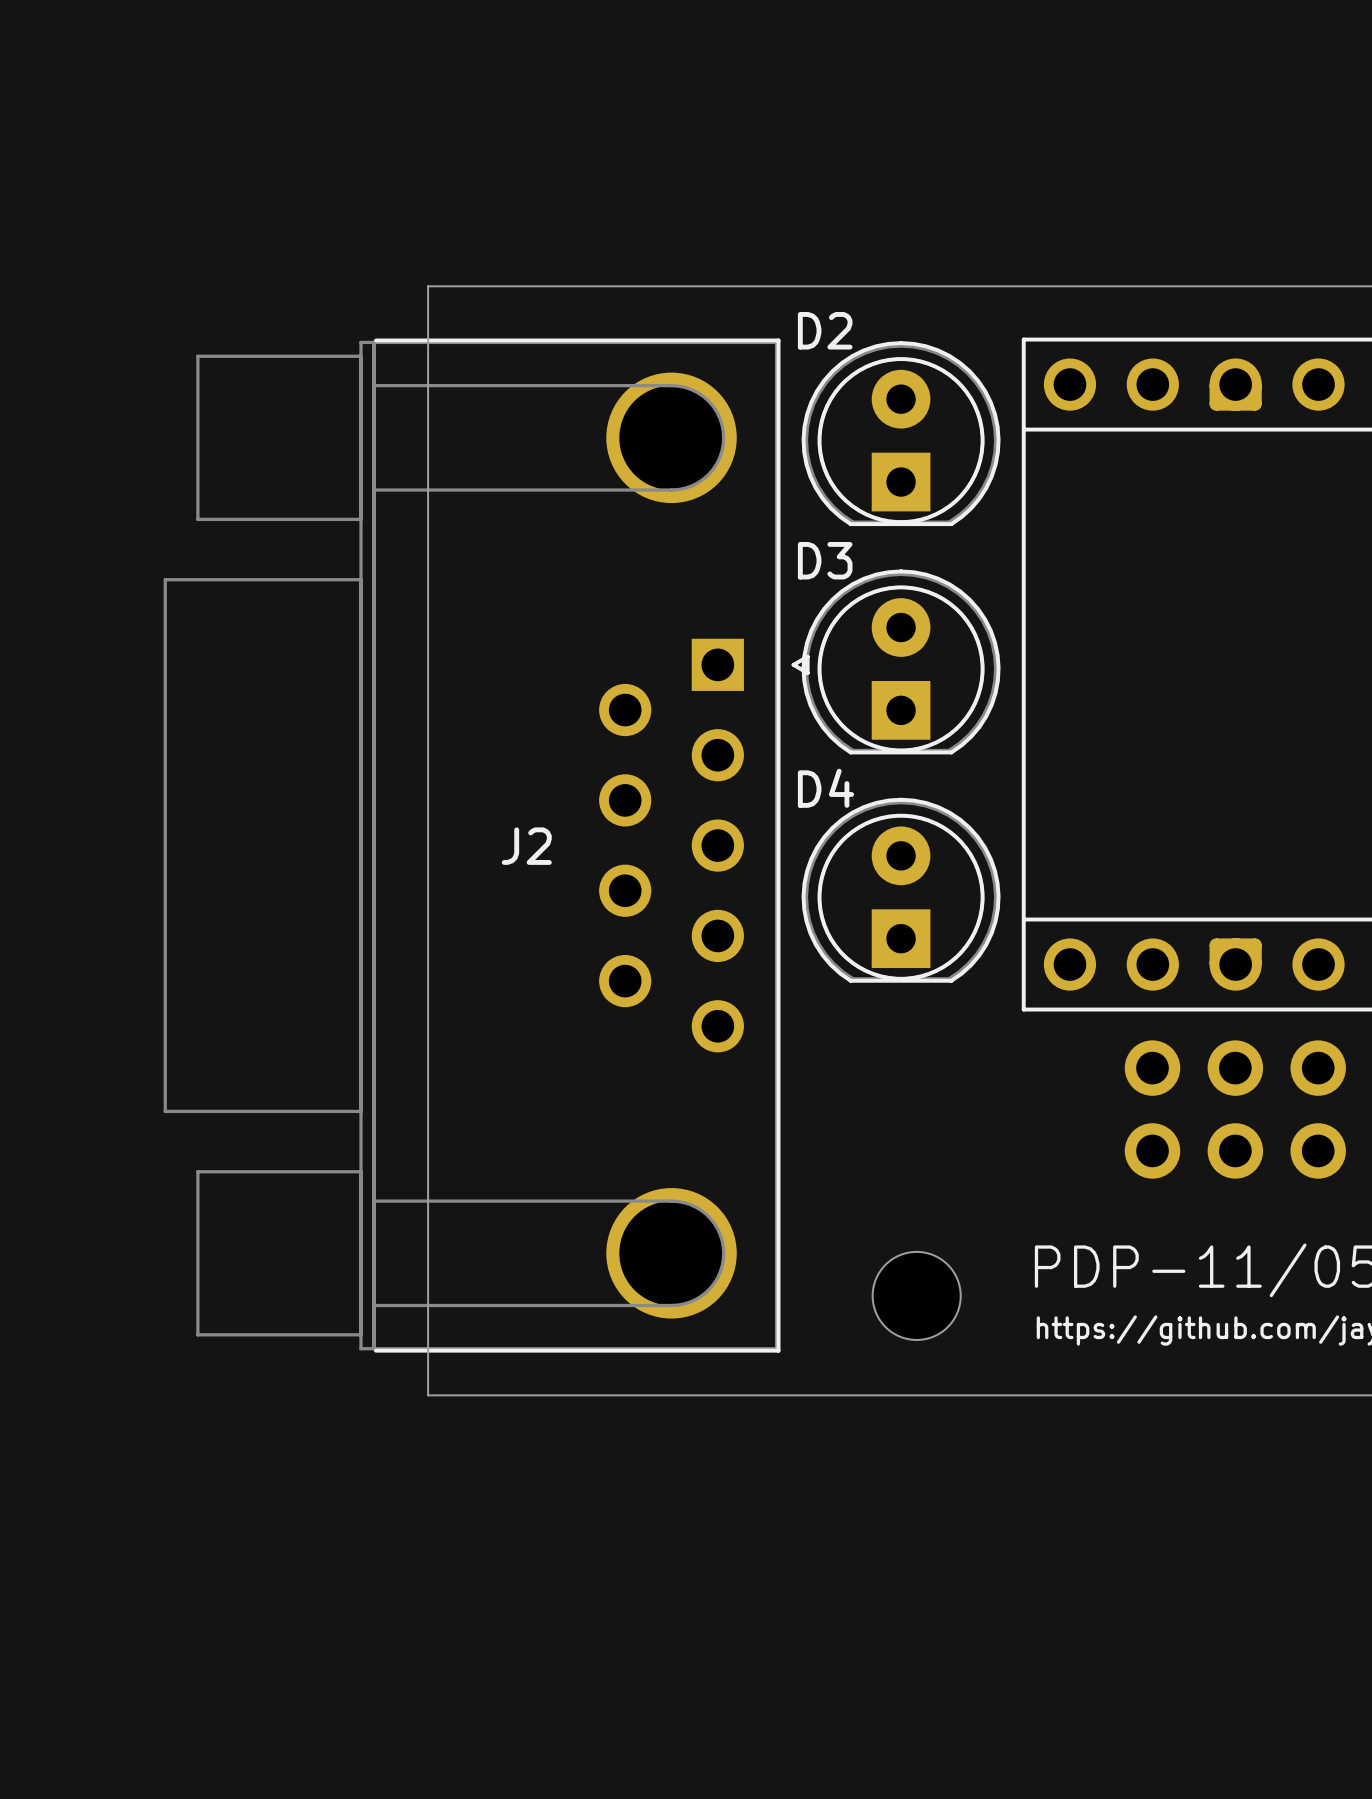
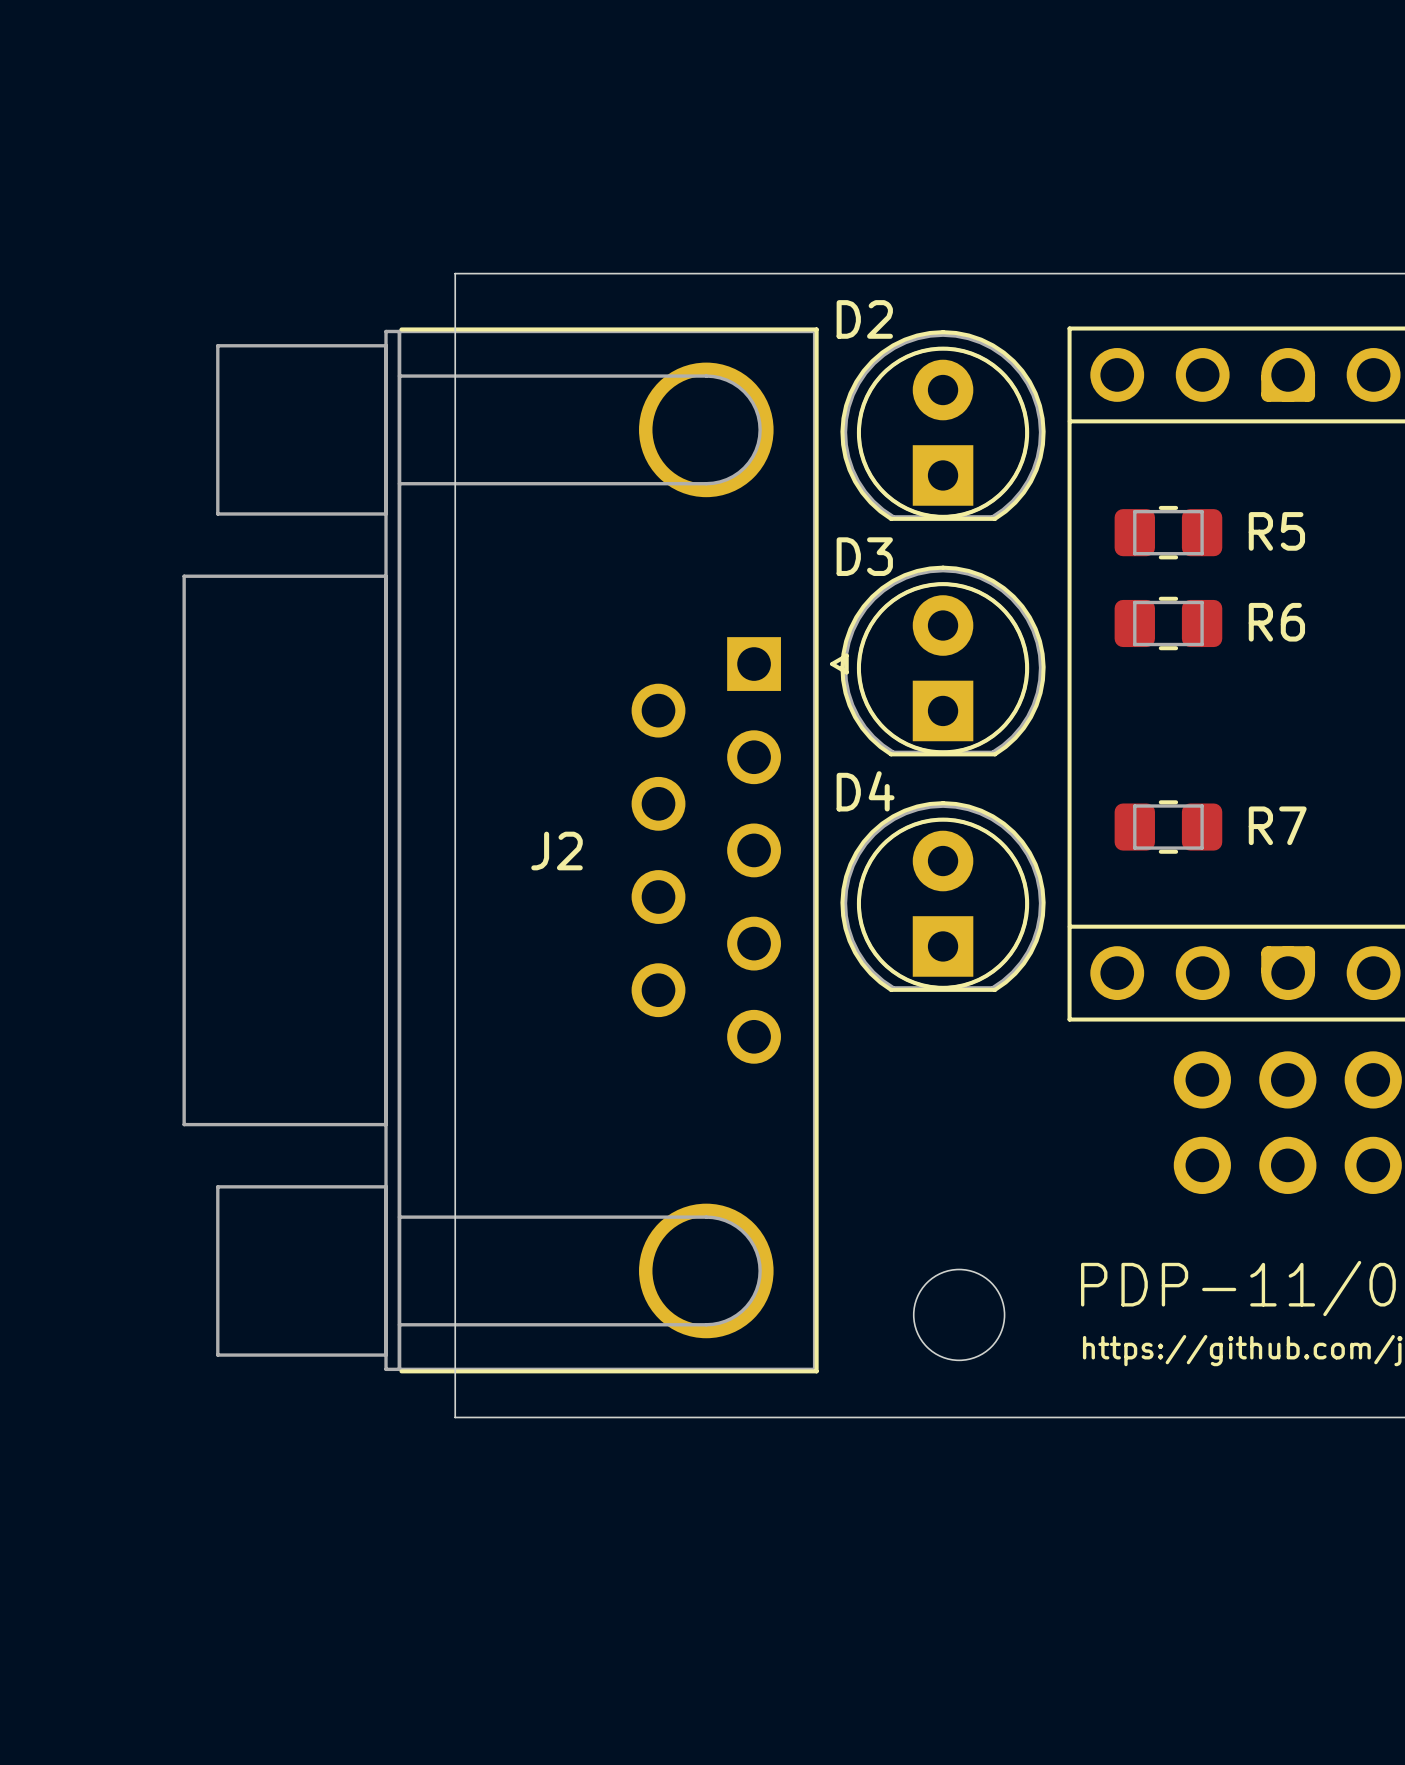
R5: none -> (1168, 532)
R6: none -> (1168, 623)
R7: none -> (1168, 827)

